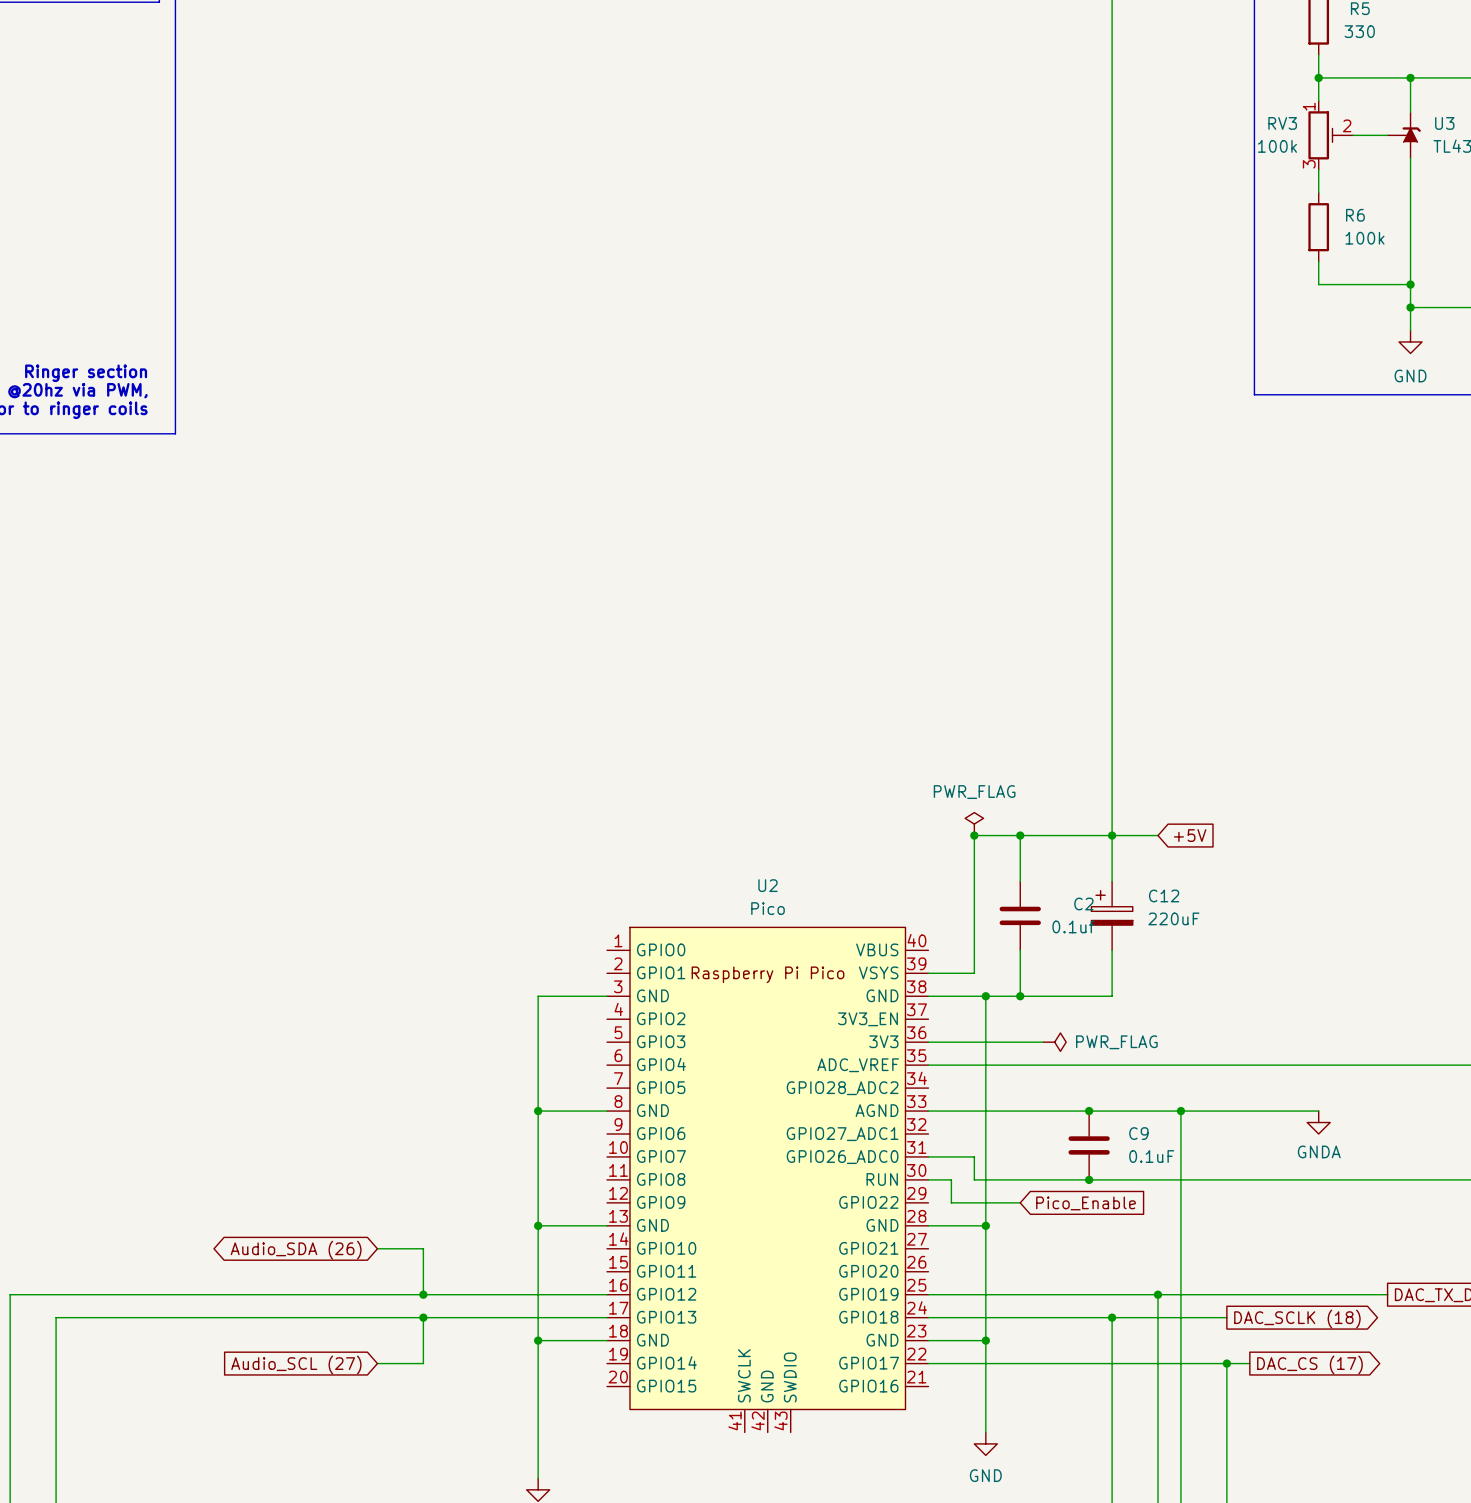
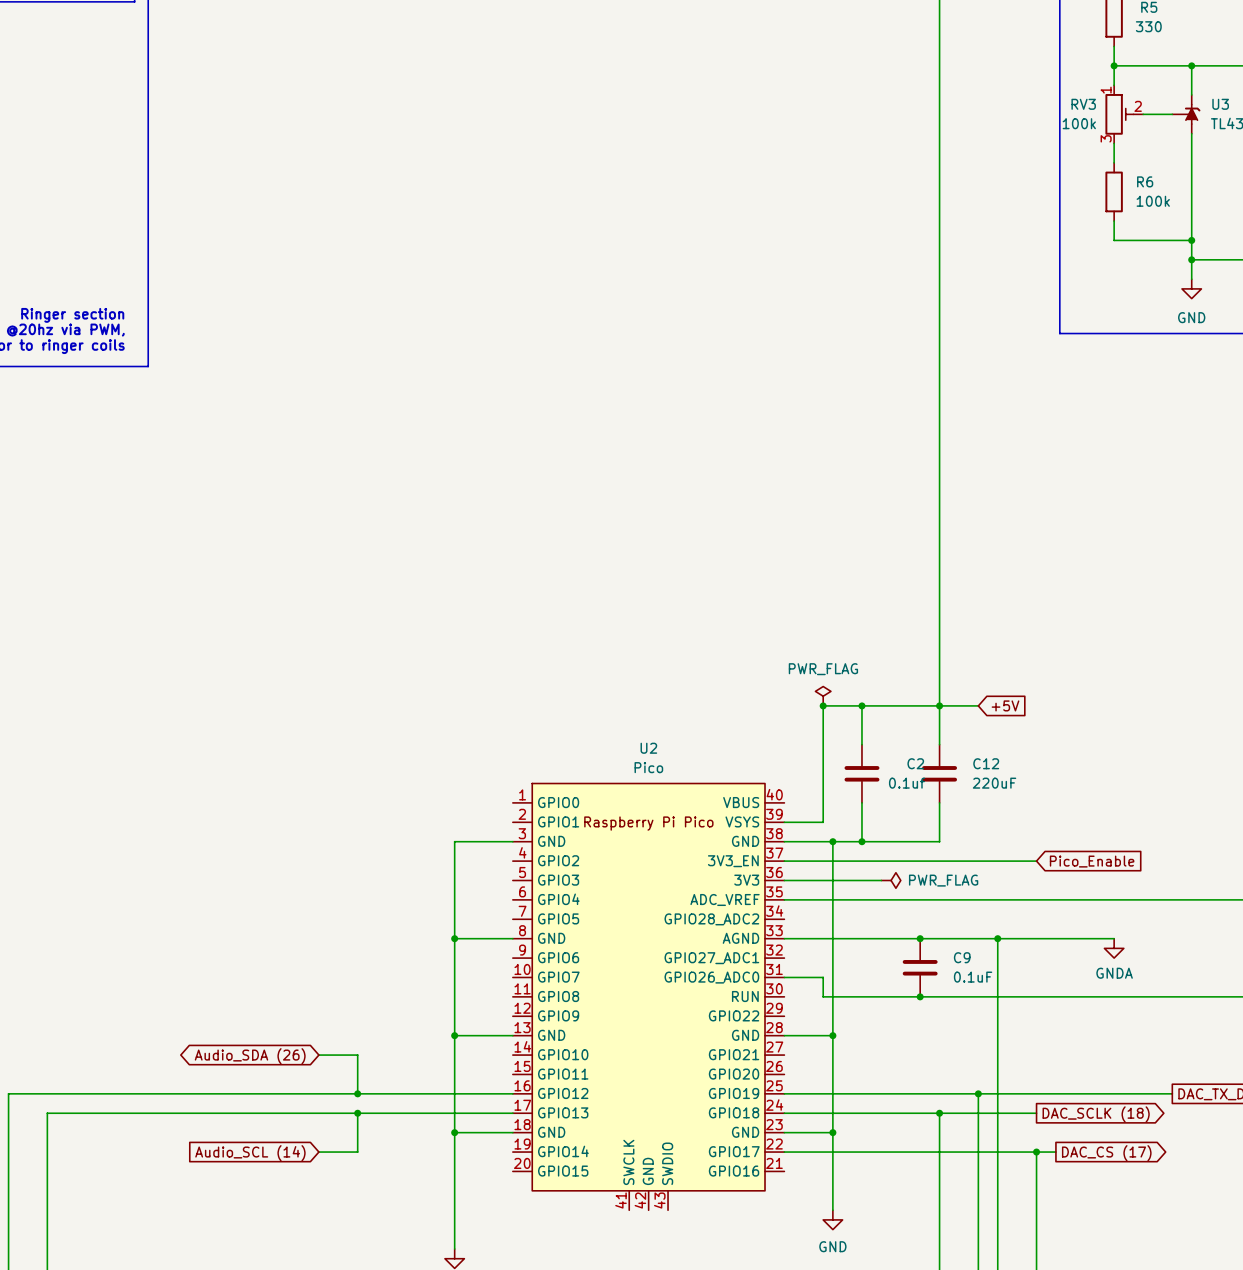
C12 symbol: [1091, 881, 1133, 951] -> [922, 744, 958, 803]
wire: none -> (784, 861) (1036, 861)
global label: none -> Pico_Enable (1092, 861)
wire: (928, 1179) (951, 1179) (951, 1202) (1020, 1202) -> none
global label: Pico_Enable (1086, 1203) -> none
global label: Audio_SCL (27) (296, 1364) -> Audio_SCL (14) (250, 1153)

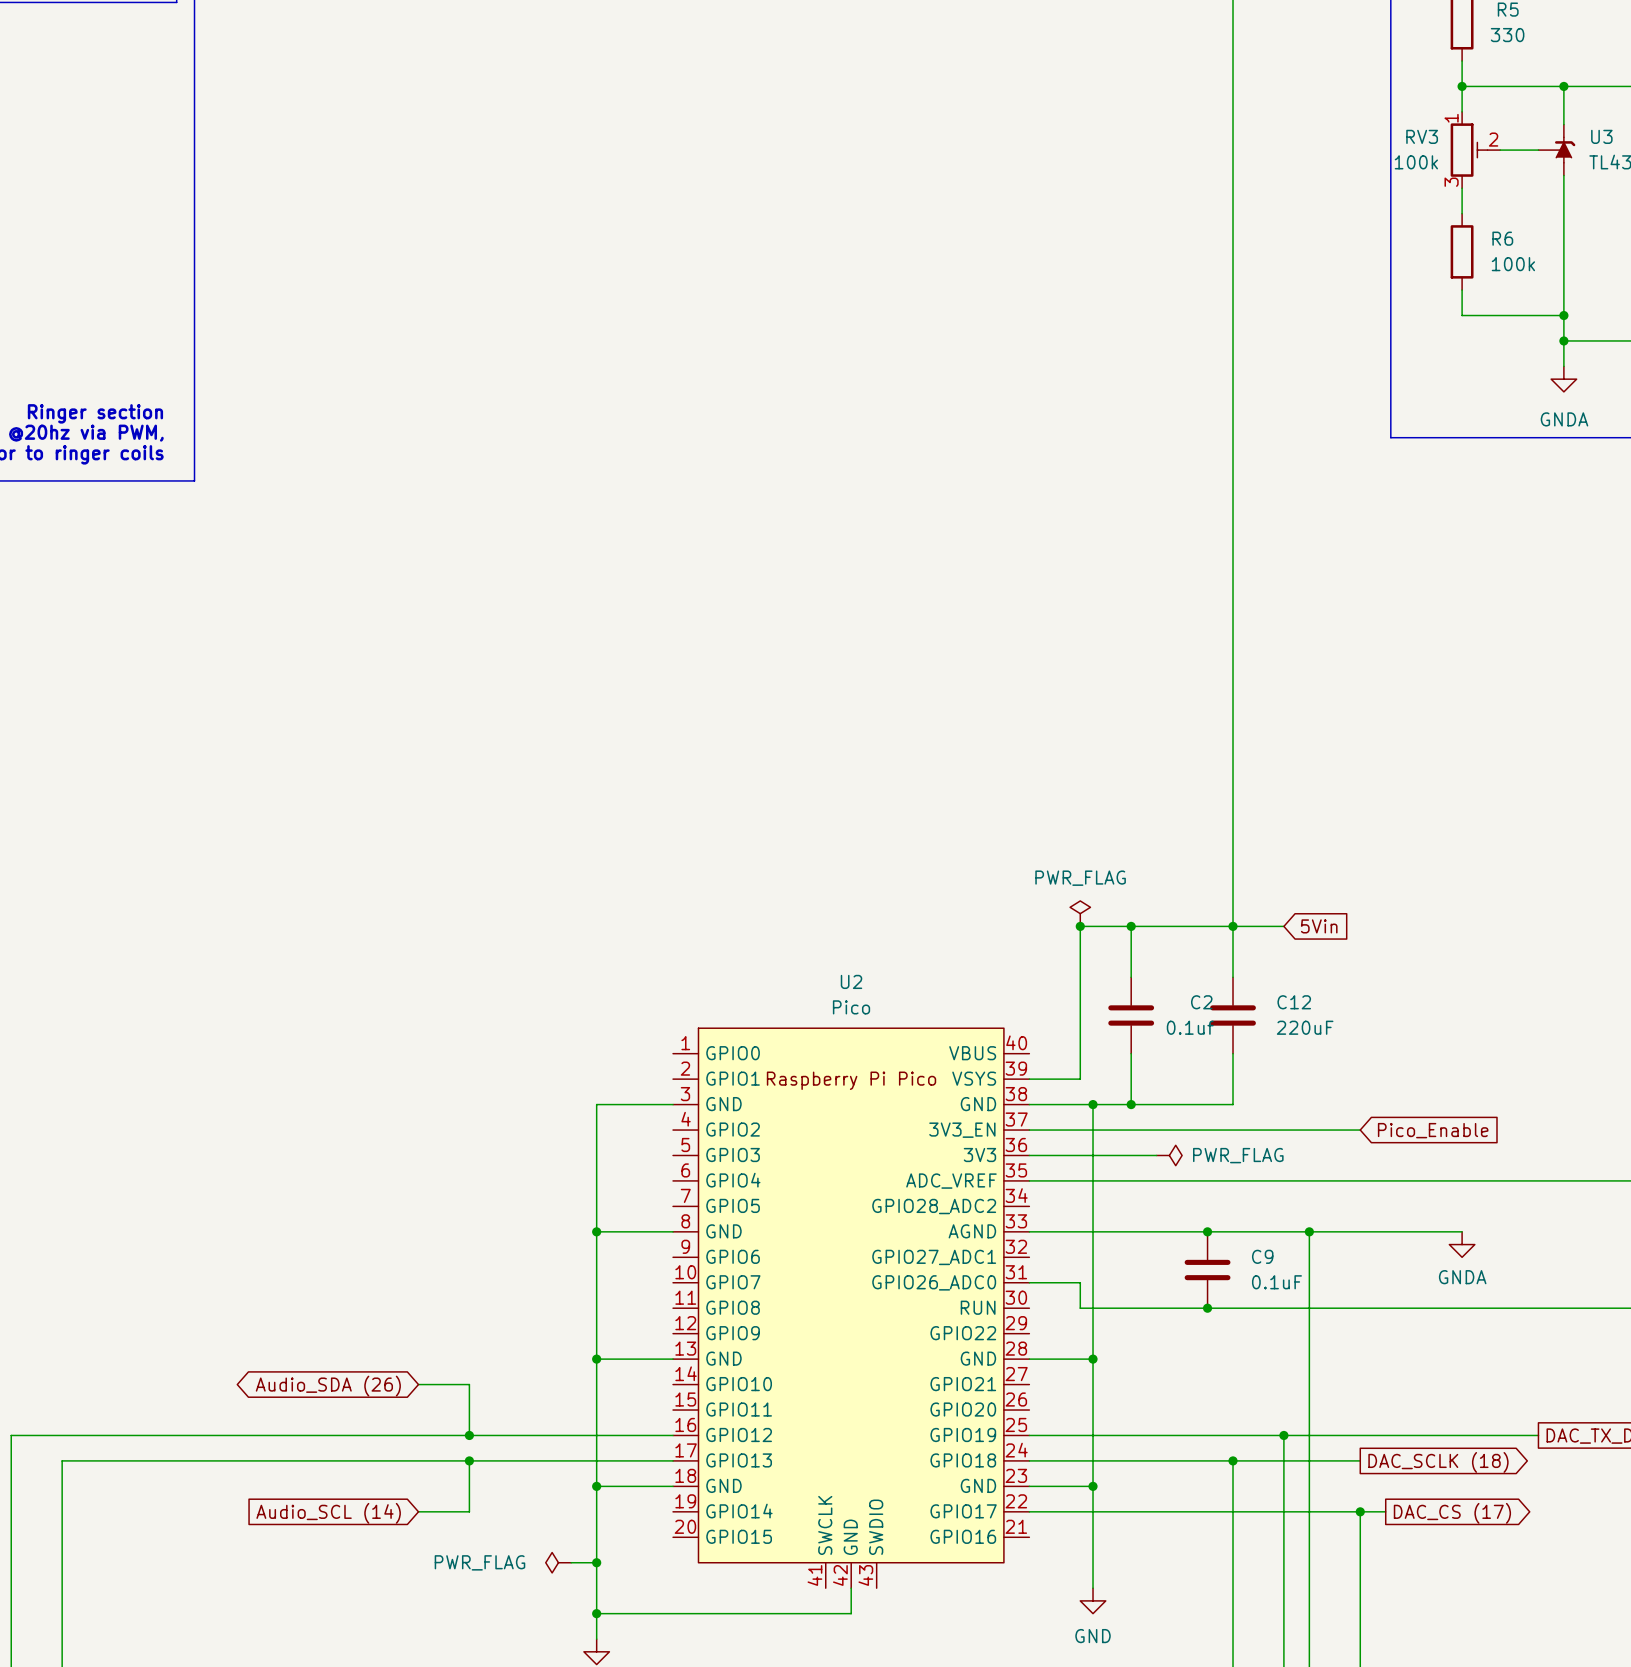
power symbol: GND (1191, 288) -> GNDA (1563, 379)
global label: +5V (1005, 705) -> 5Vin (1319, 926)
power symbol: none -> PWR_FLAG (558, 1562)
wire: none -> (571, 1562) (596, 1562)
junction: none -> (596, 1562)
wire: none -> (851, 1588) (851, 1613) (596, 1613)
junction: none -> (596, 1613)

